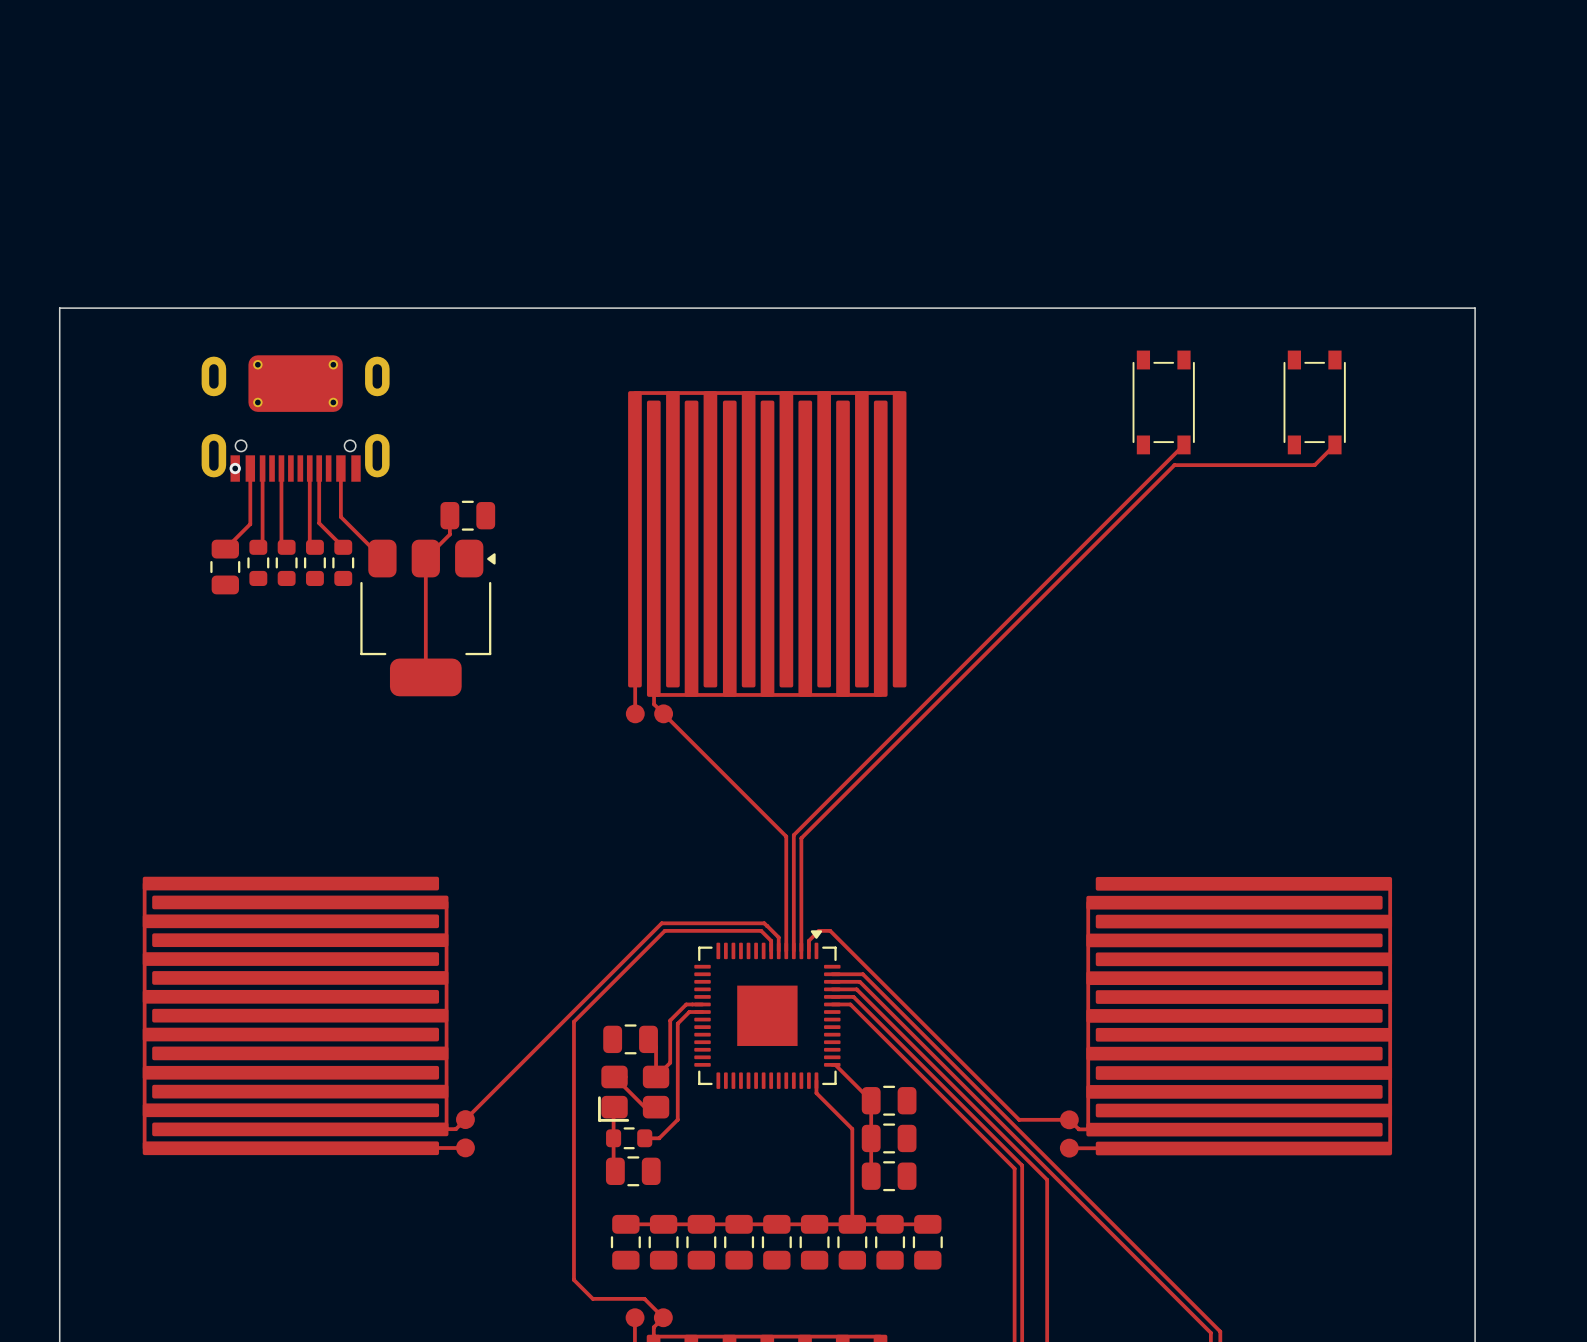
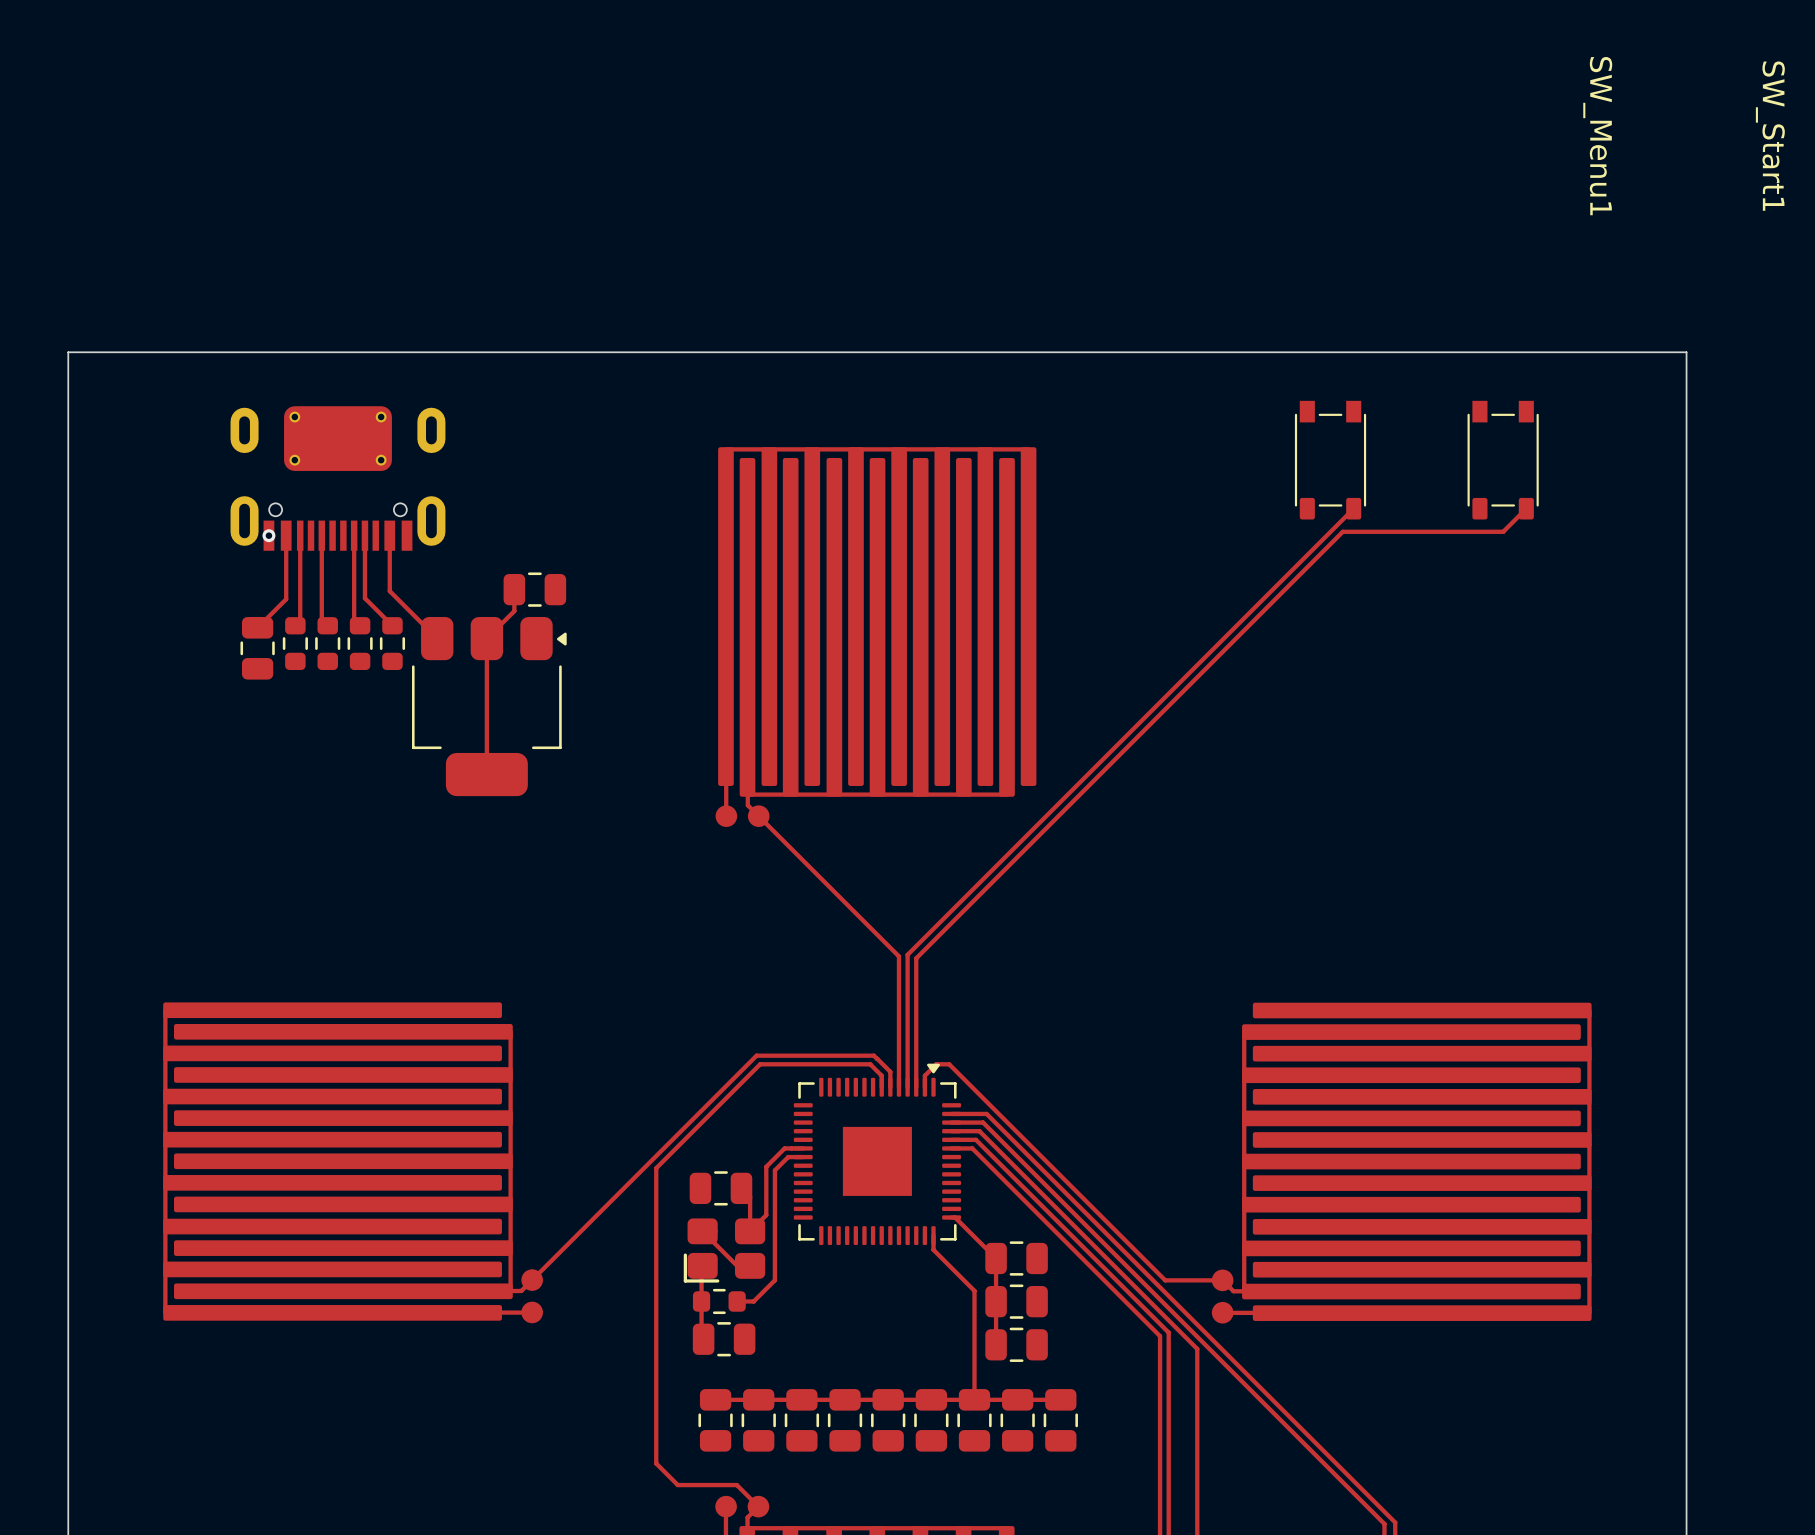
part: (1163, 402) -> none
SW_Menu1: none -> (1330, 460)
part: (1314, 402) -> none
SW_Start1: none -> (1503, 460)

